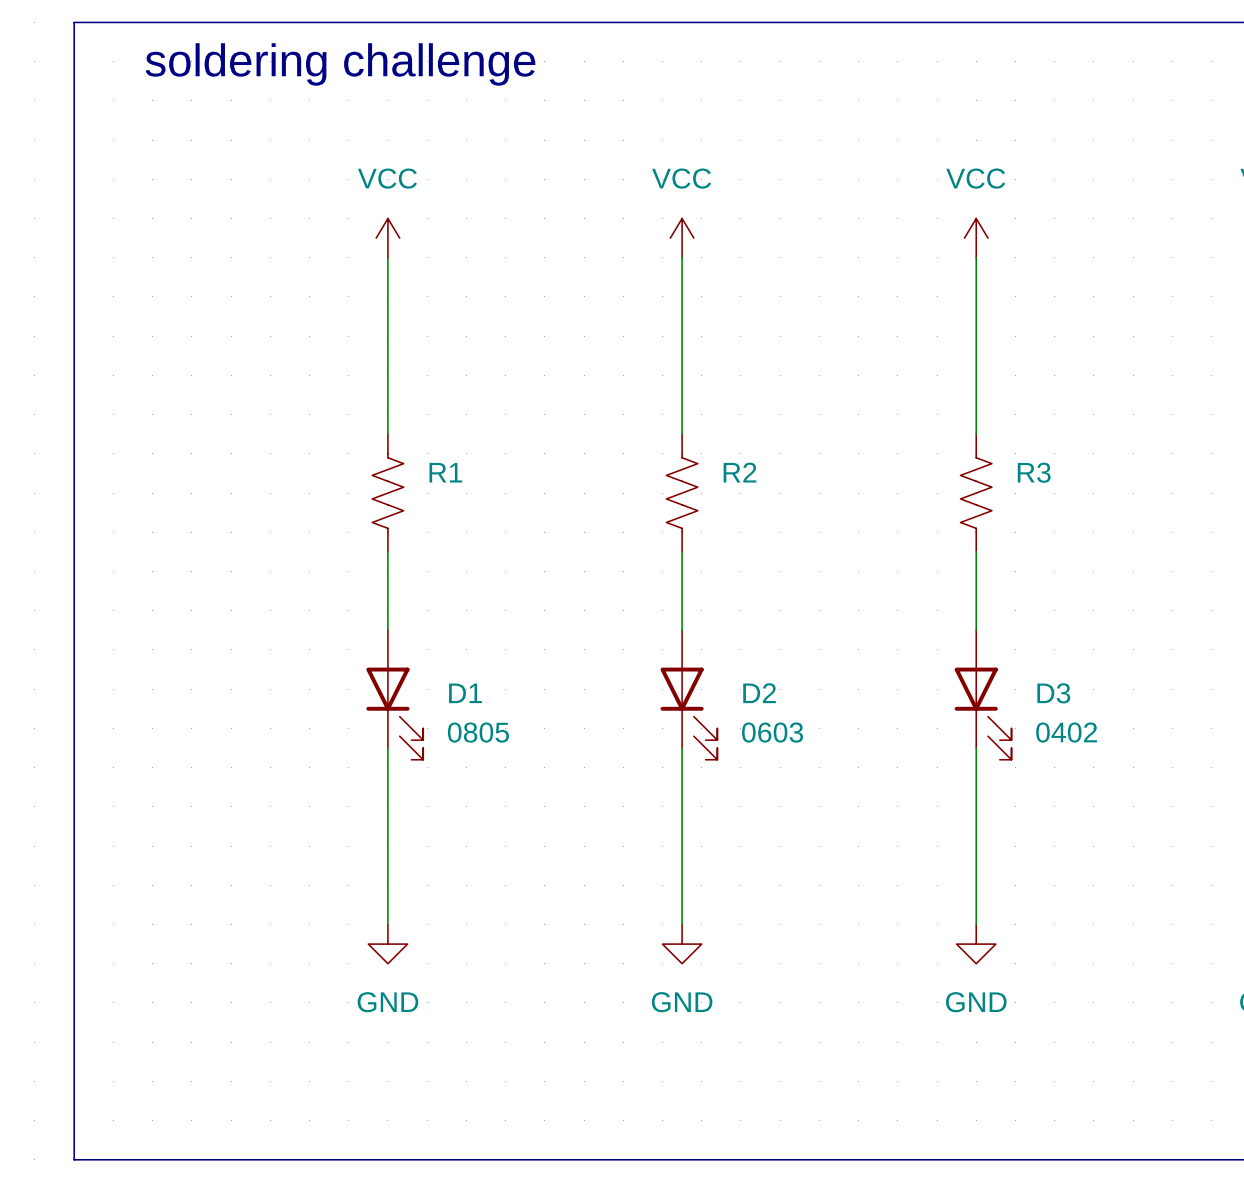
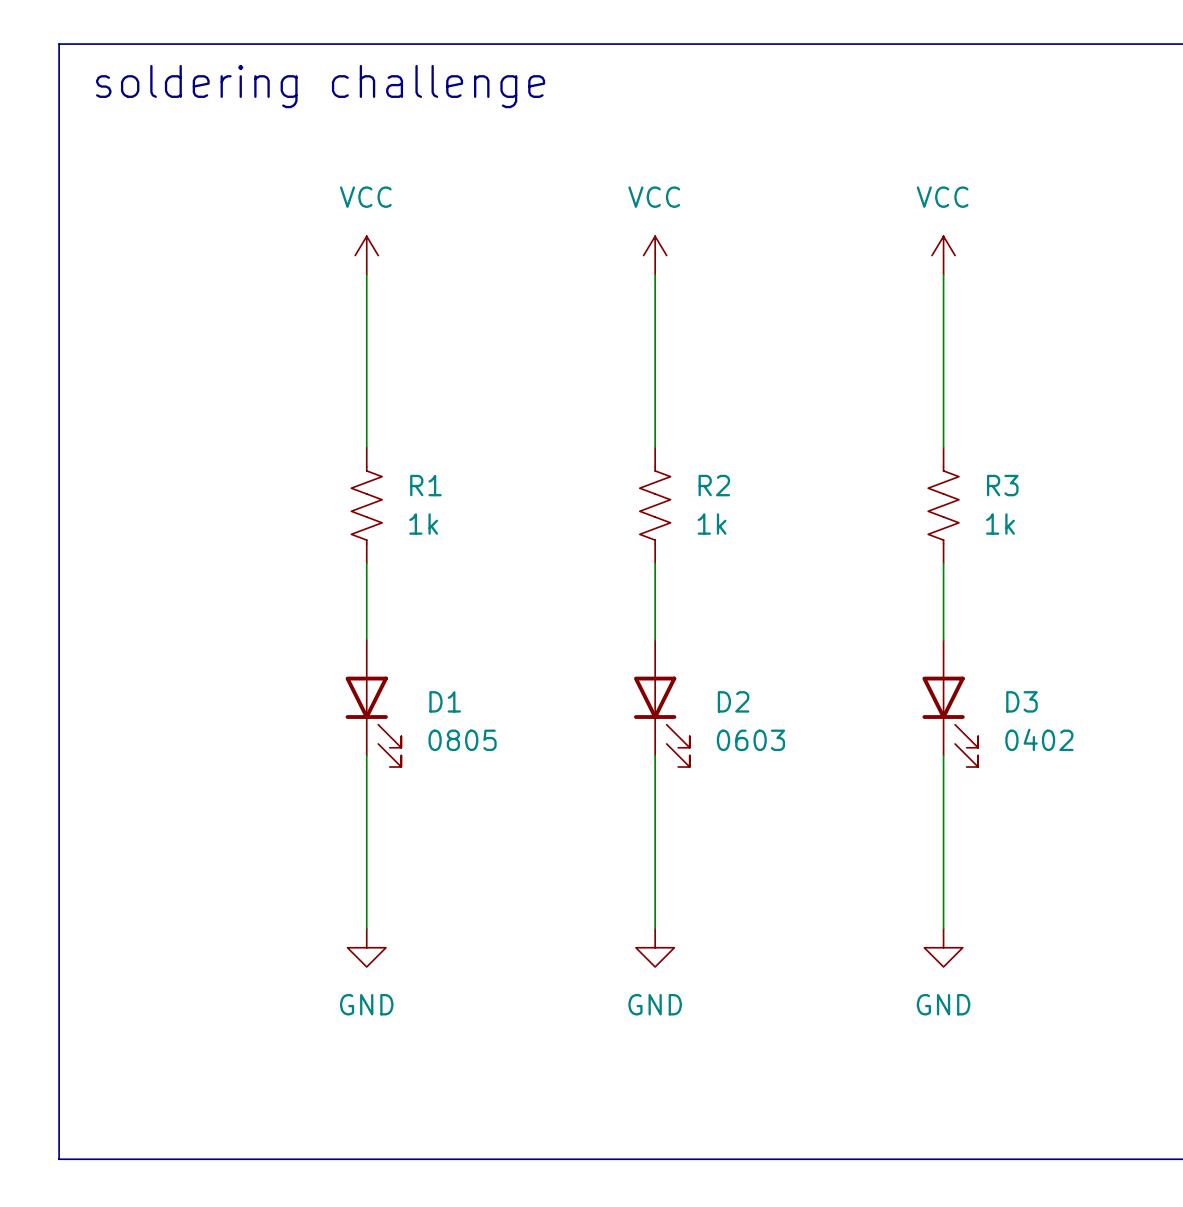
R1 value: none -> 1k (423, 524)
R2 value: none -> 1k (712, 524)
R3 value: none -> 1k (1000, 524)

